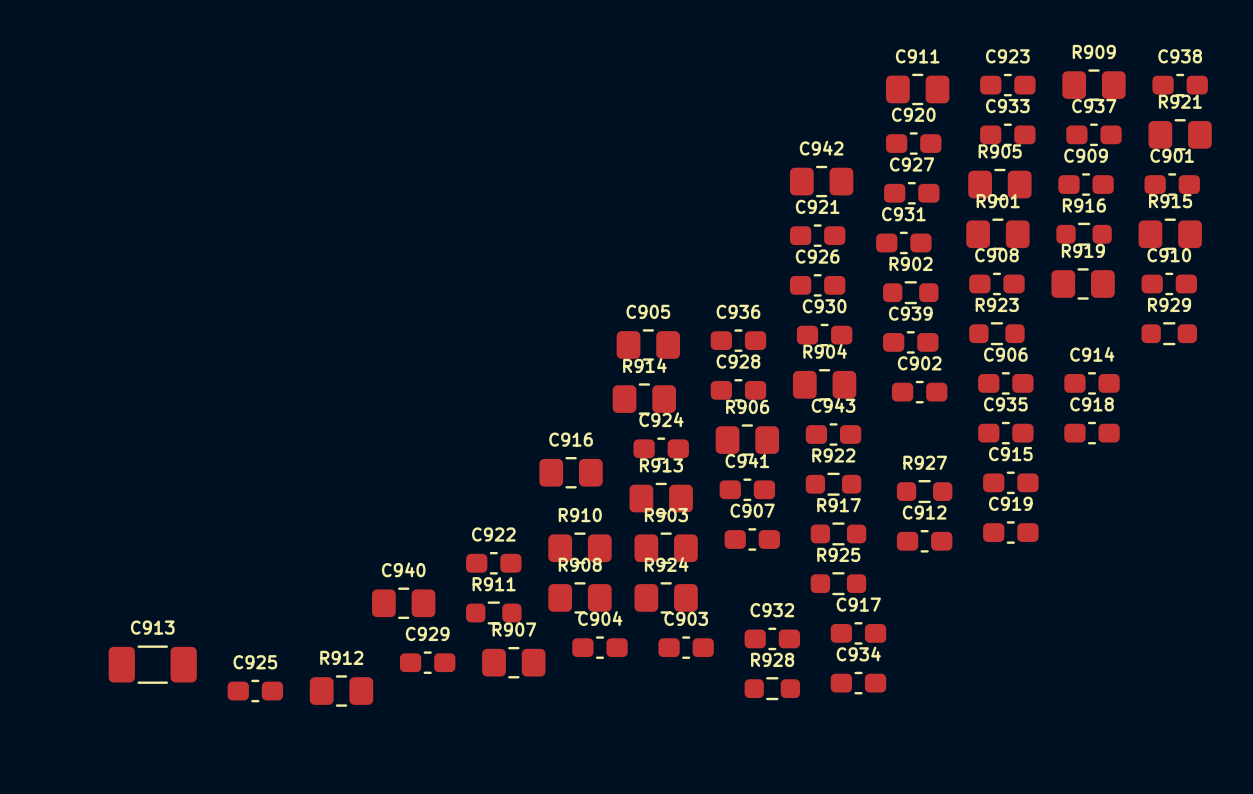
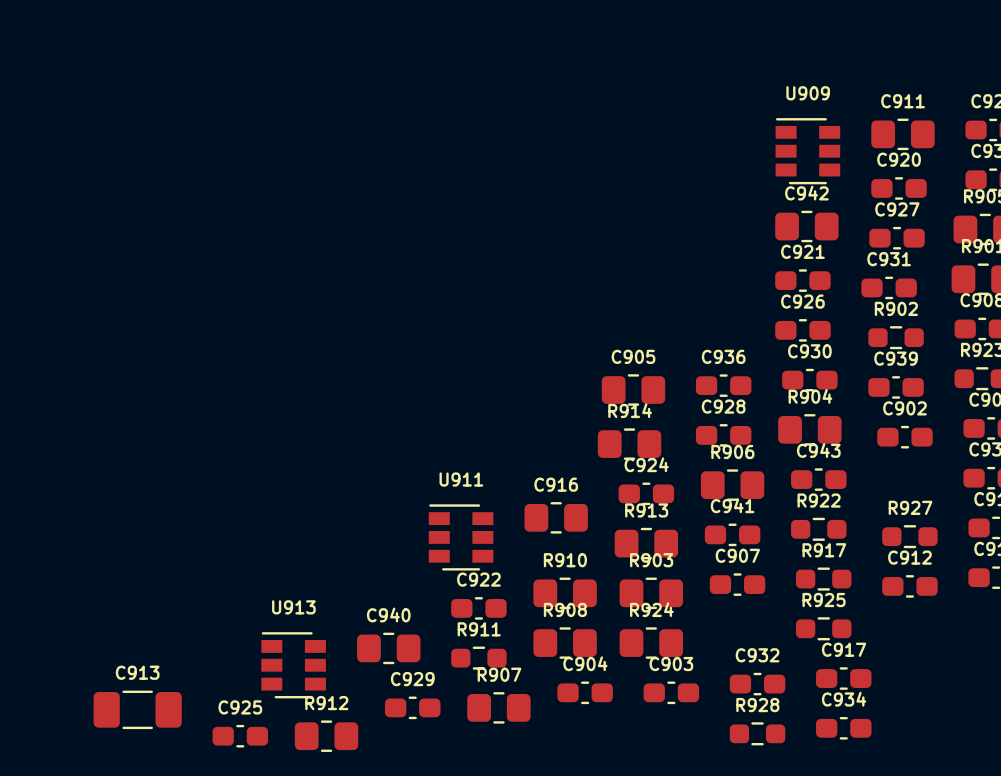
U909: none -> (807, 151)
U911: none -> (461, 537)
U913: none -> (293, 665)

